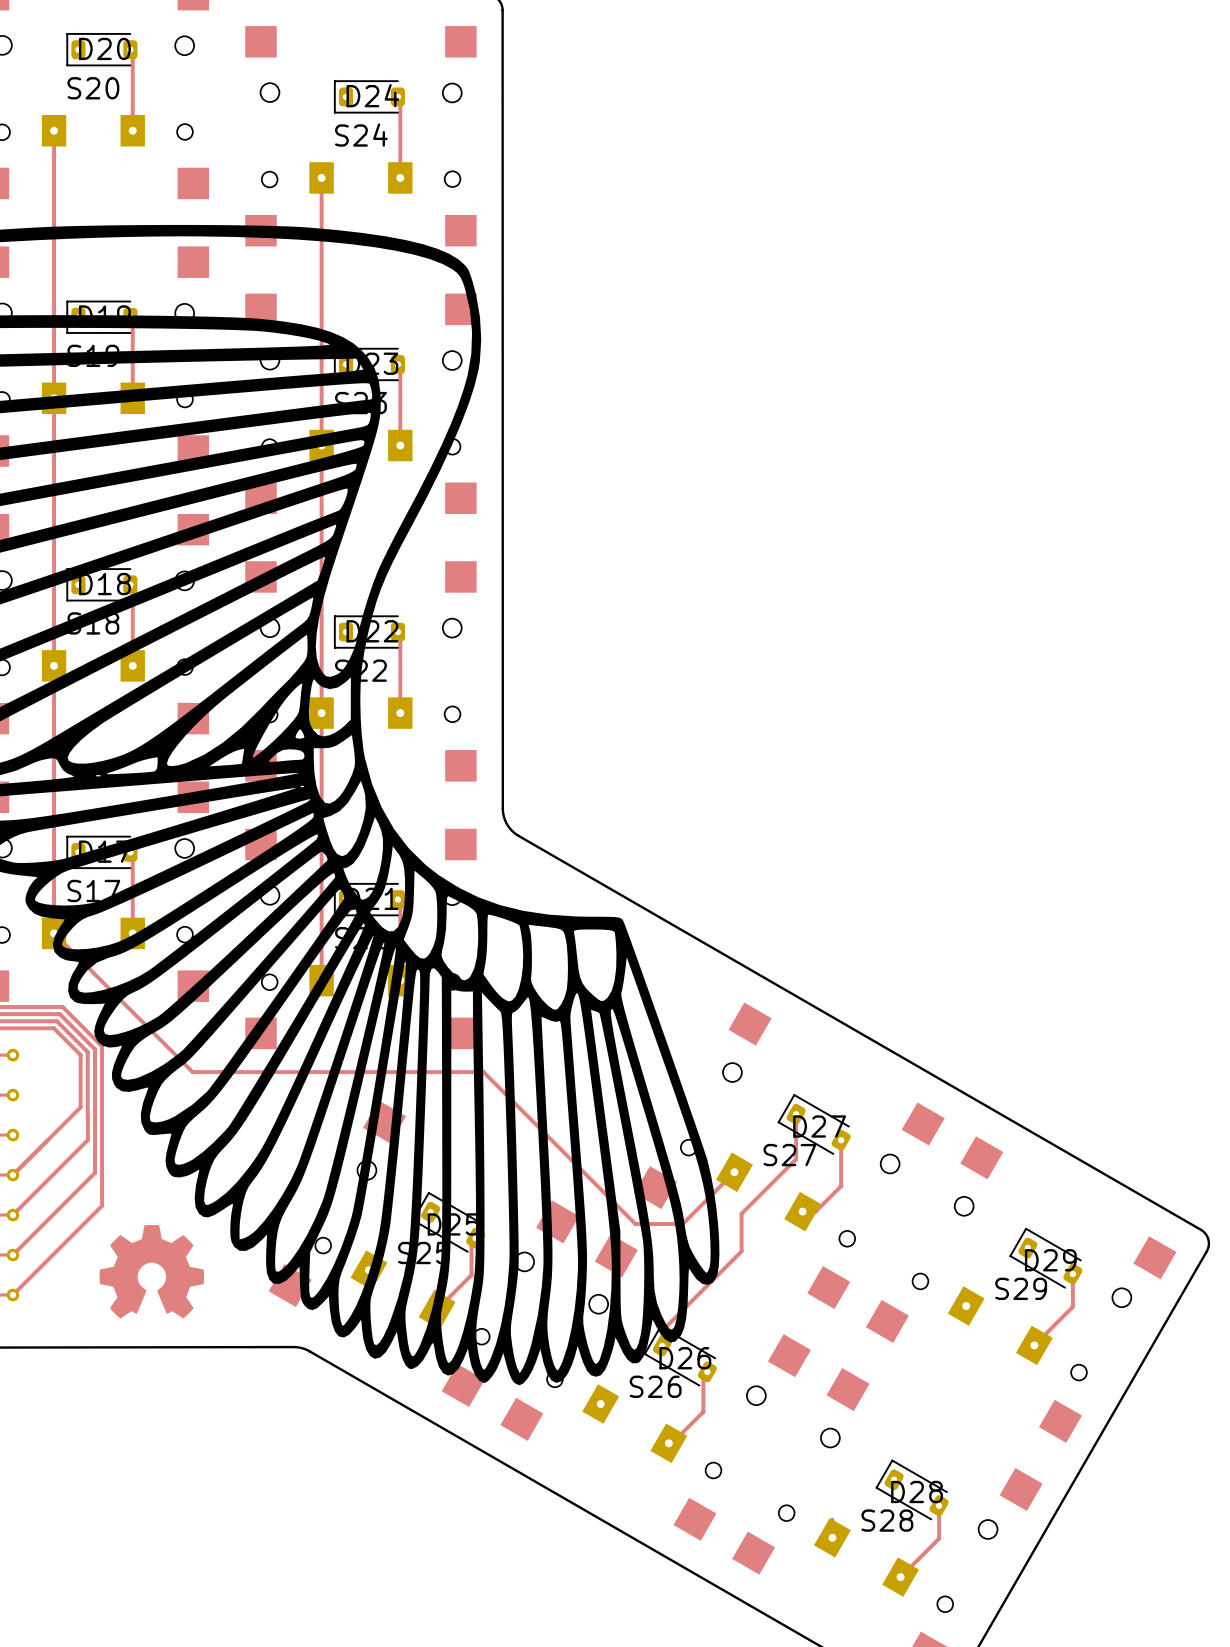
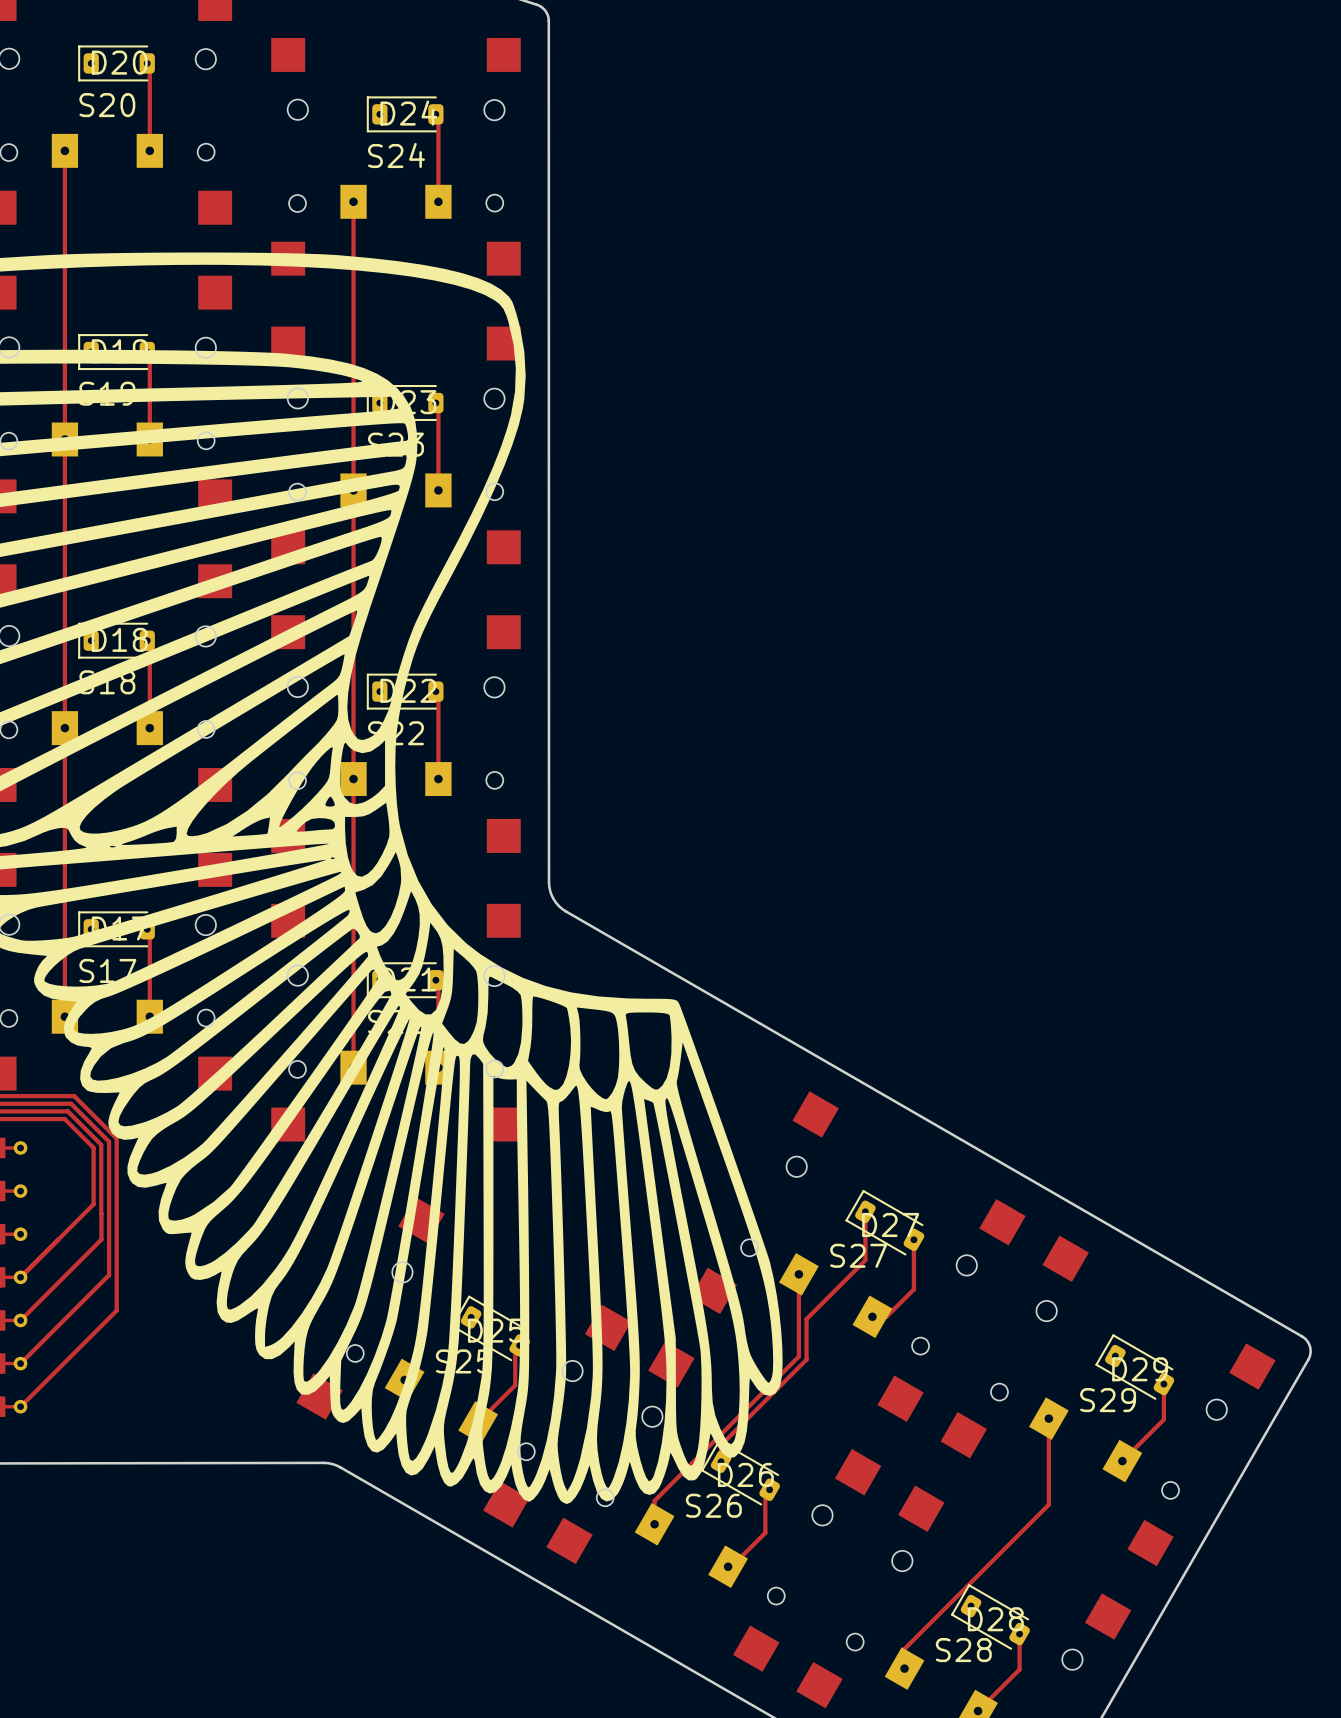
track: (54, 933) (192, 1072) (483, 1072) (635, 1224) (682, 1224) (734, 1172) -> (654, 1524) (654, 1500) (798, 1356) (798, 1274)
drawing: [99, 1225, 205, 1319] -> none
track: none -> (1048, 1418) (1048, 1504) (904, 1649)

